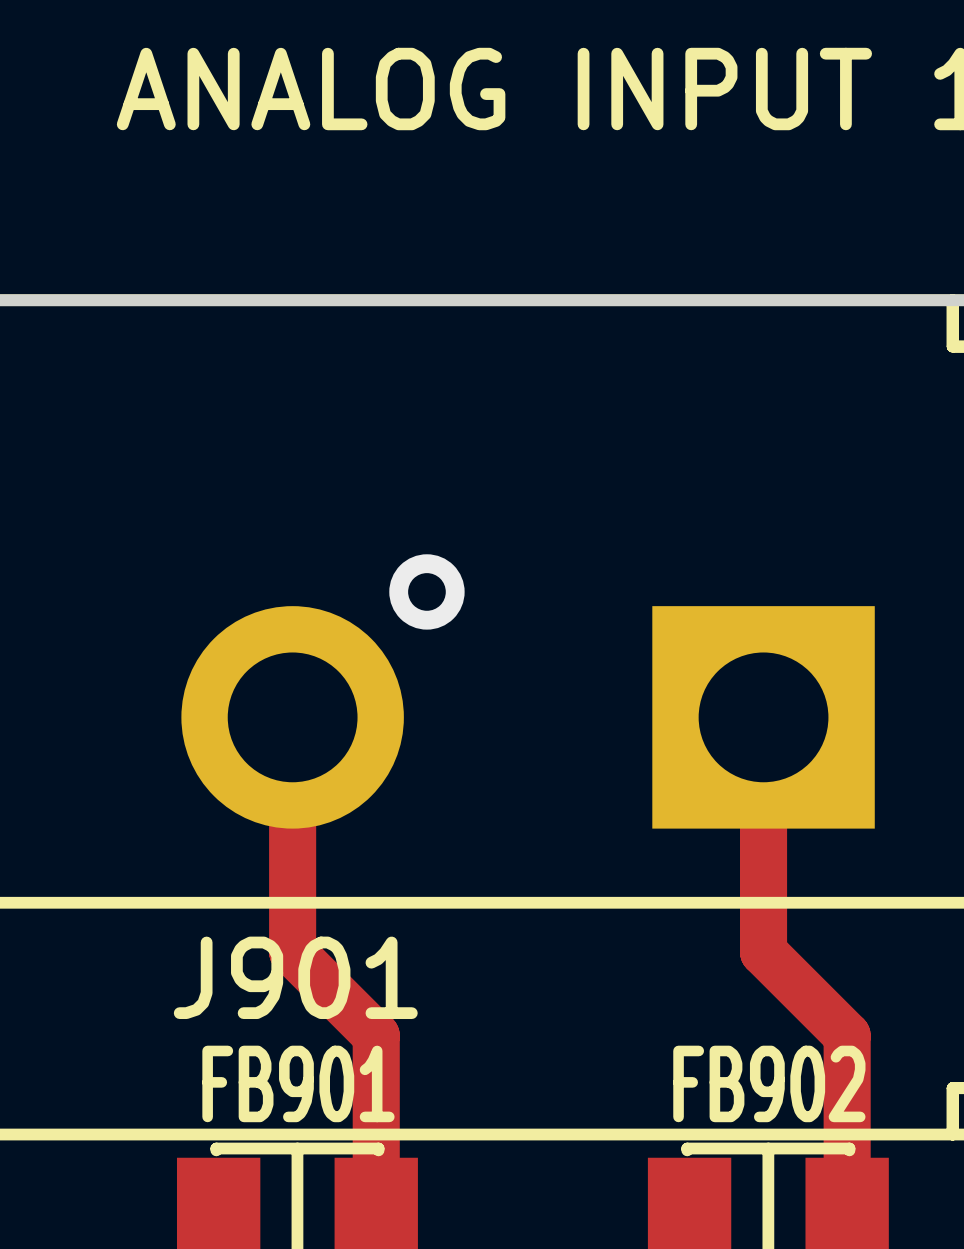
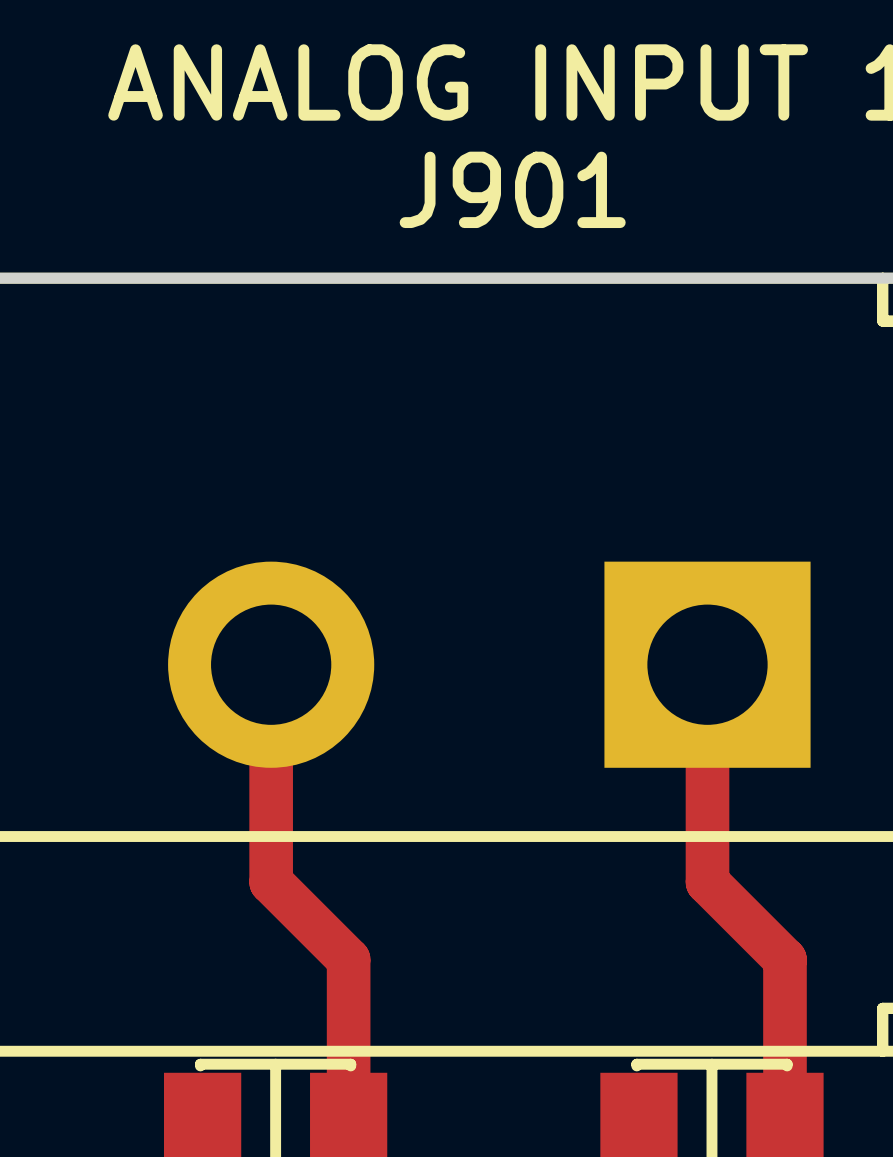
via: (426, 591) -> none
J901 name position: J901 (295, 977) -> J901 (512, 189)
FB901 name: FB901 (298, 1083) -> none
FB902 name: FB902 (769, 1083) -> none

